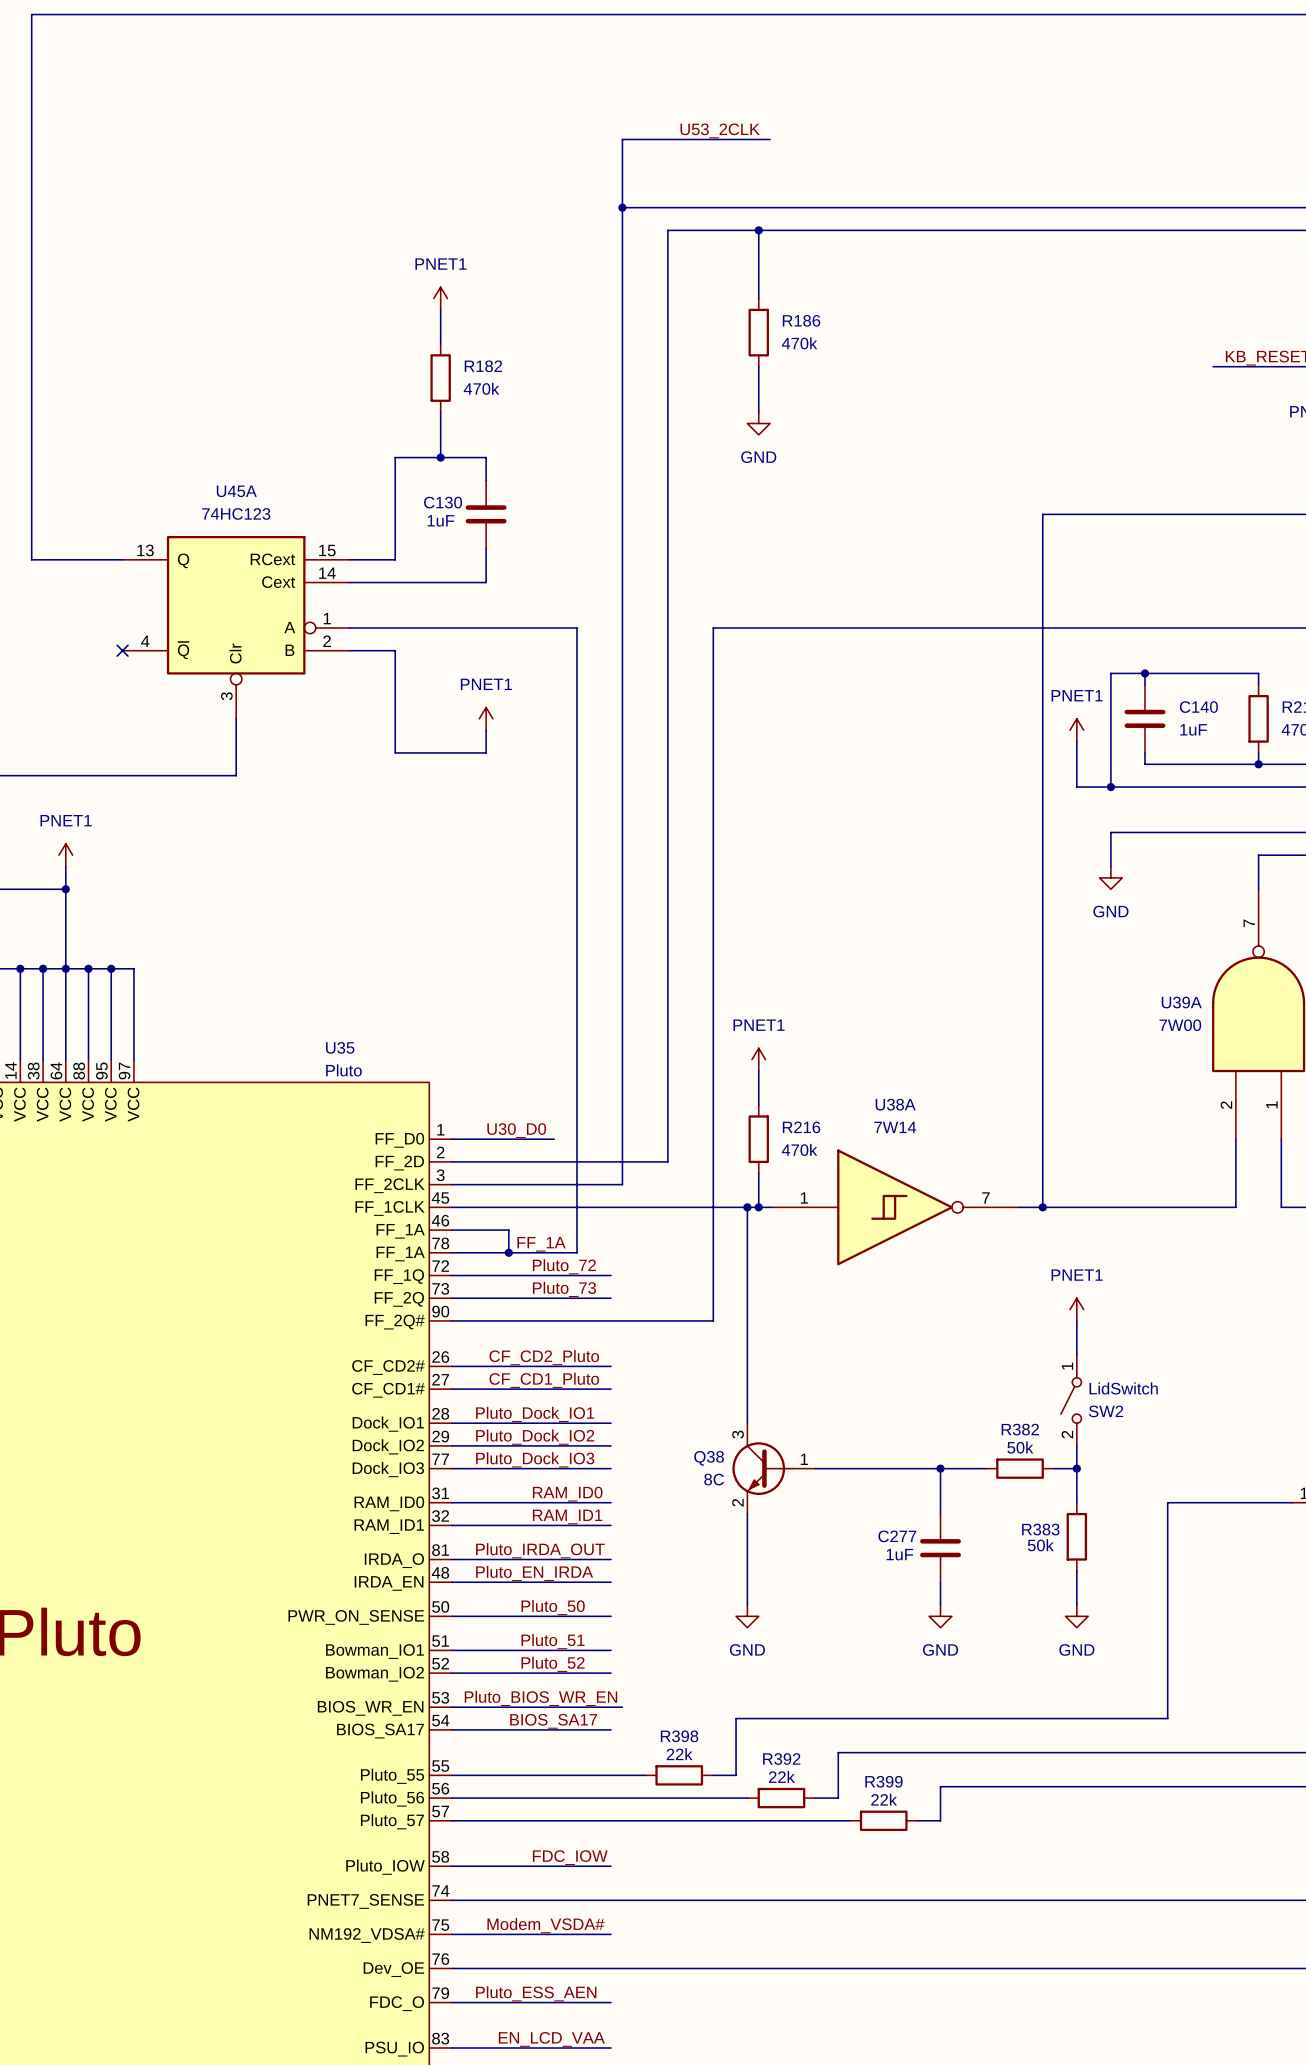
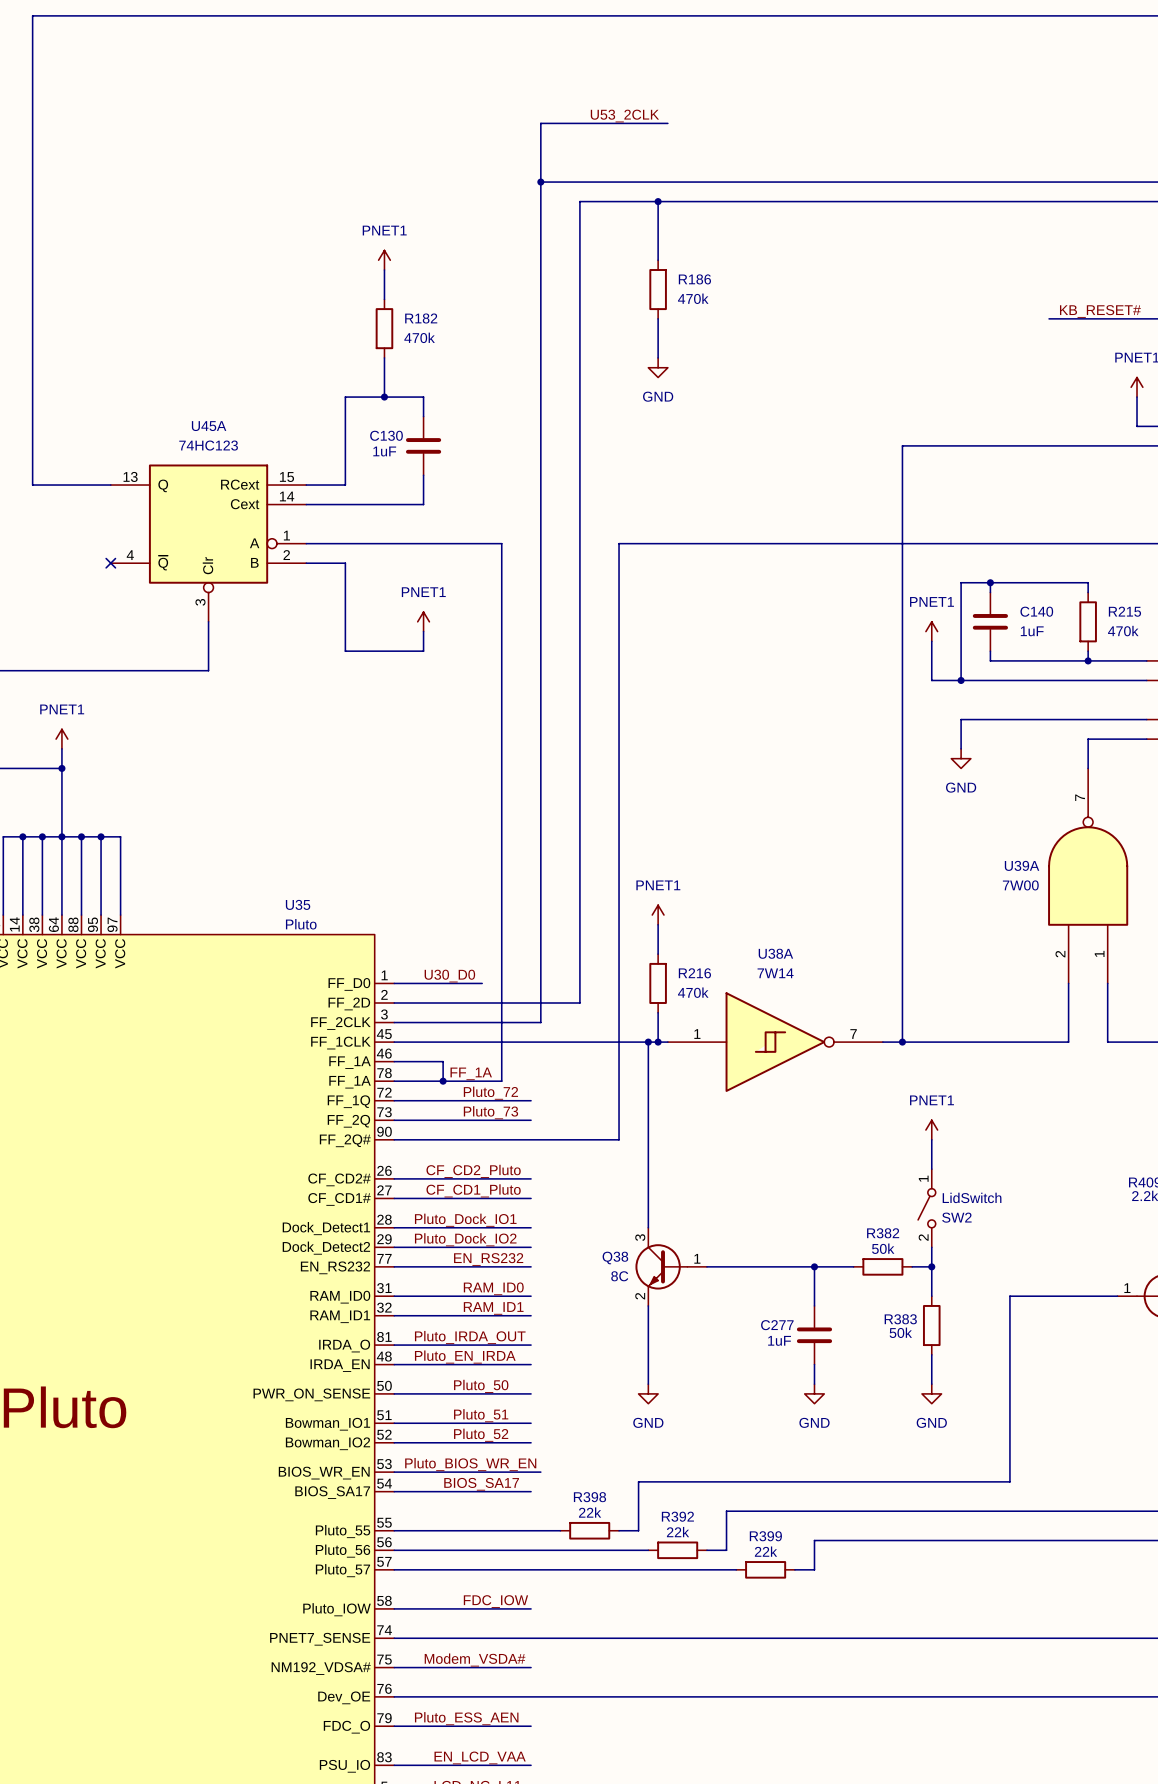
U35 pin name: Dock_IO1 (388, 1424) -> Dock_Detect1 (326, 1228)
U35 pin name: Dock_IO2 (388, 1446) -> Dock_Detect2 (326, 1248)
label: Pluto_Dock_IO3 (535, 1459) -> none
label: none -> EN_RS232 (488, 1259)
U35 pin name: Dock_IO3 (388, 1469) -> EN_RS232 (335, 1267)

